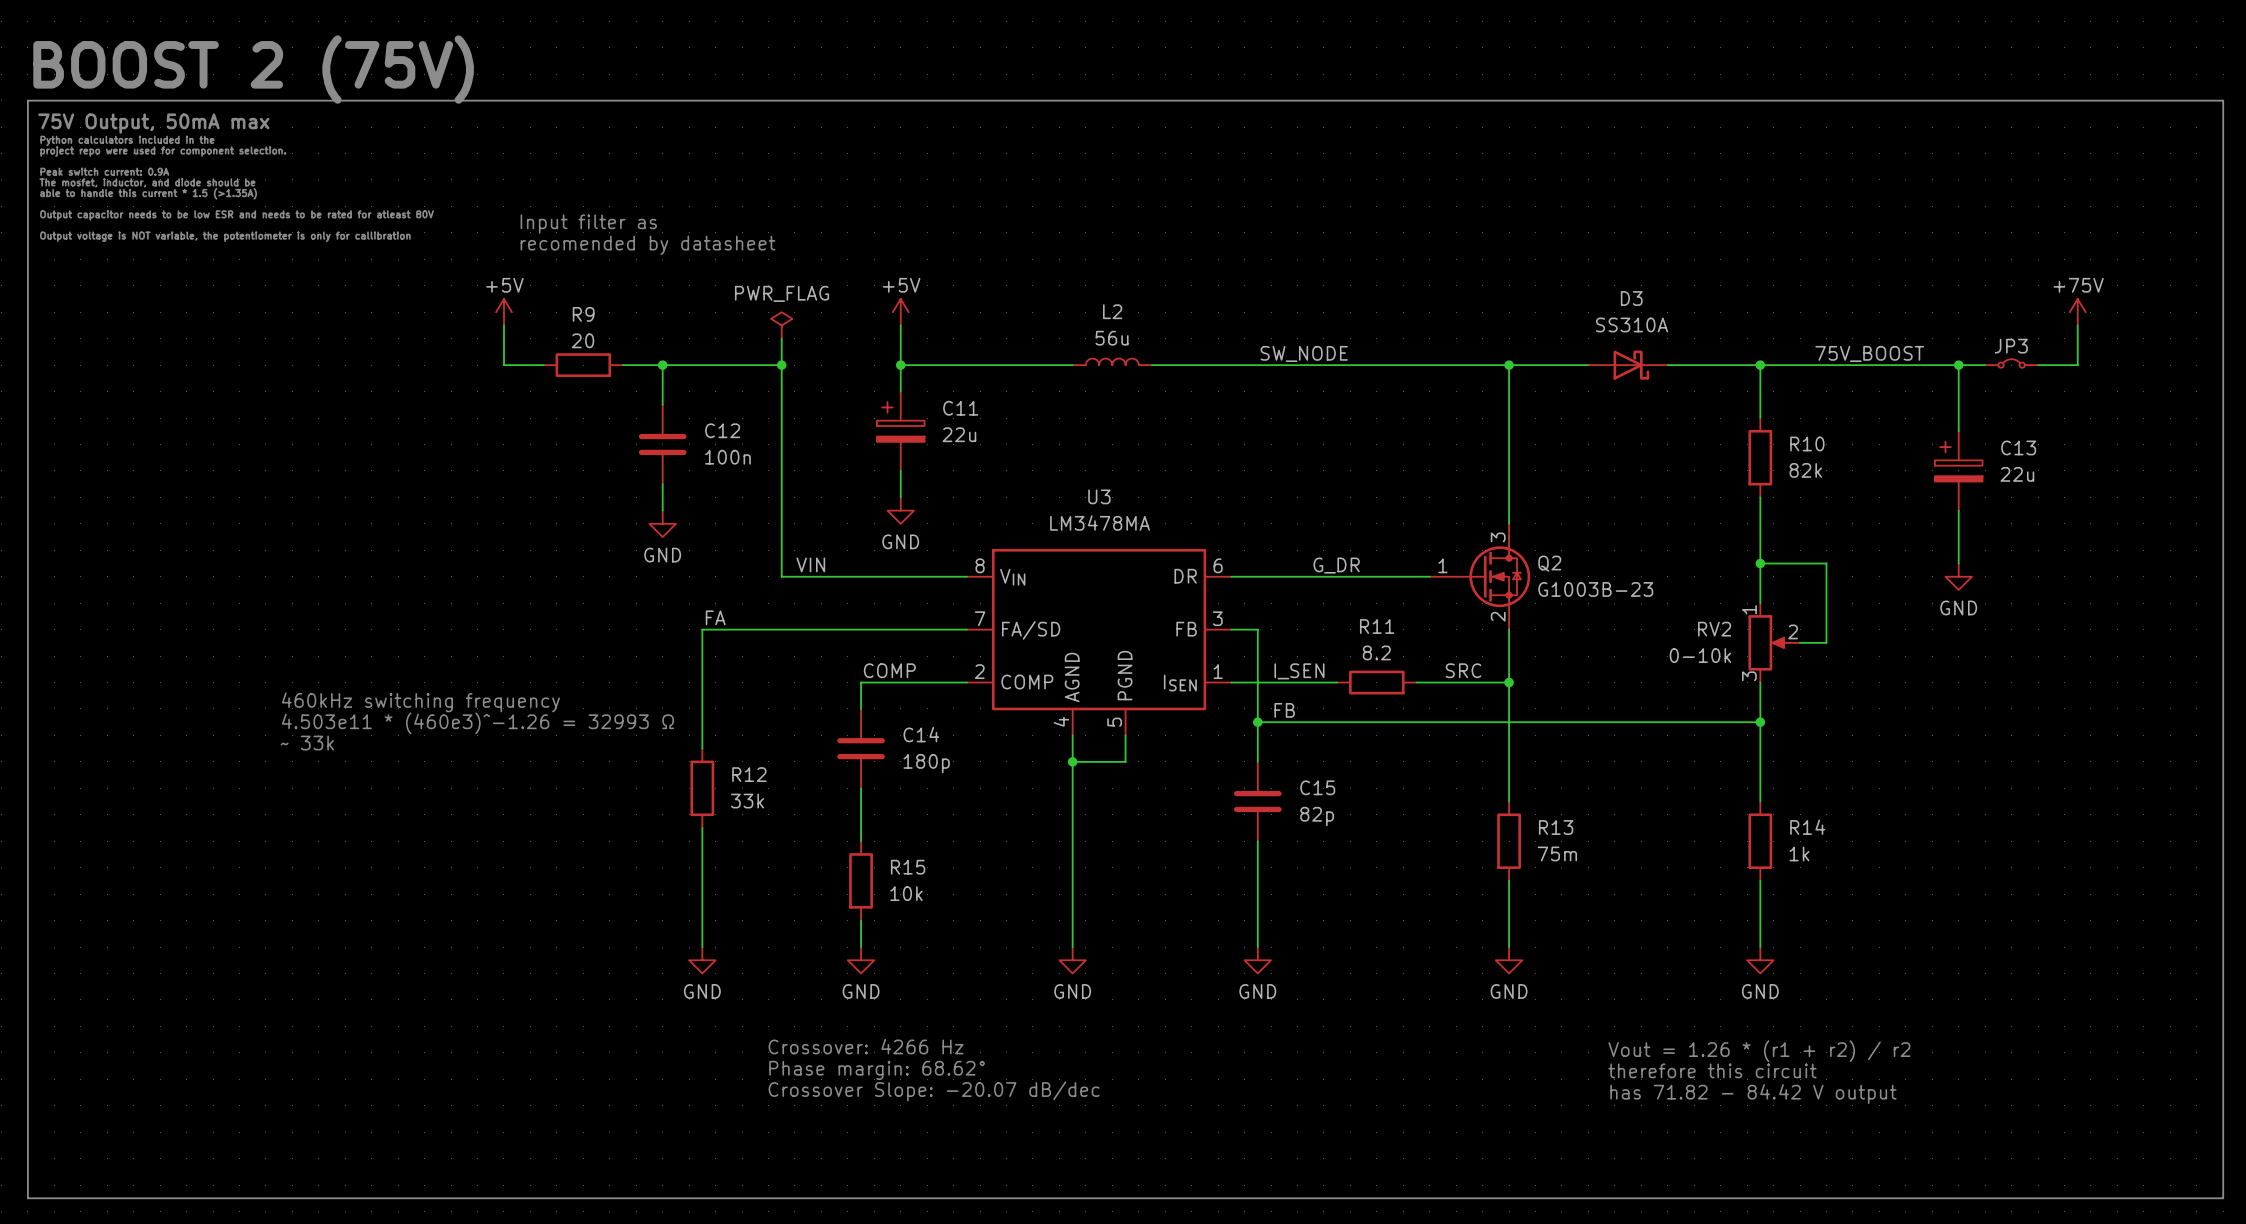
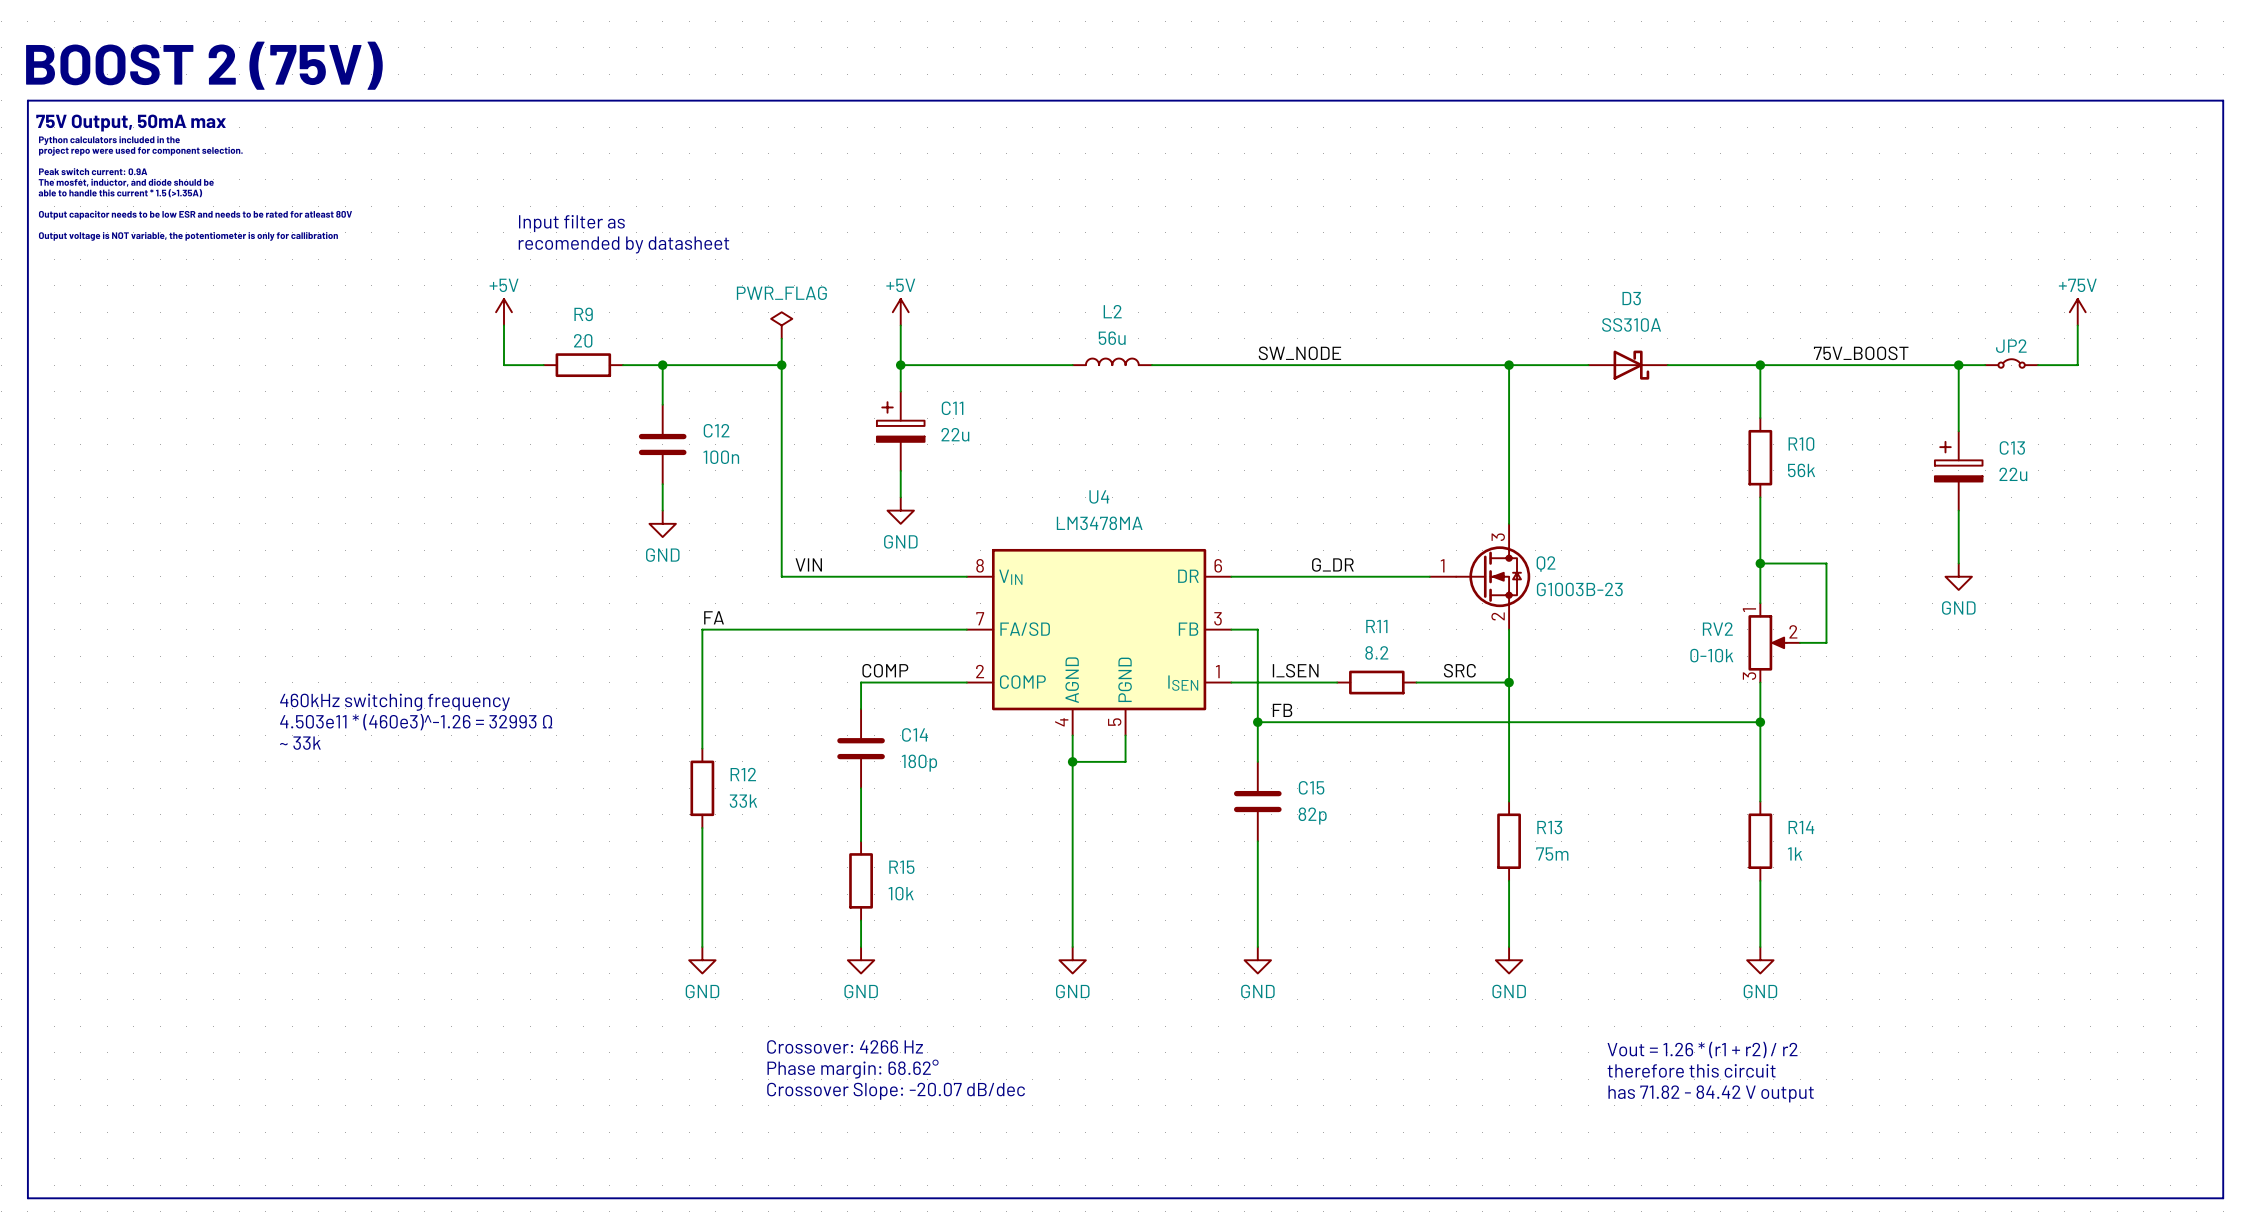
JP3 name: JP3 (2011, 346) -> JP2 (2011, 346)
R10 value: 82k (1805, 470) -> 56k (1801, 470)
U3 name: U3 (1099, 496) -> U4 (1099, 496)

